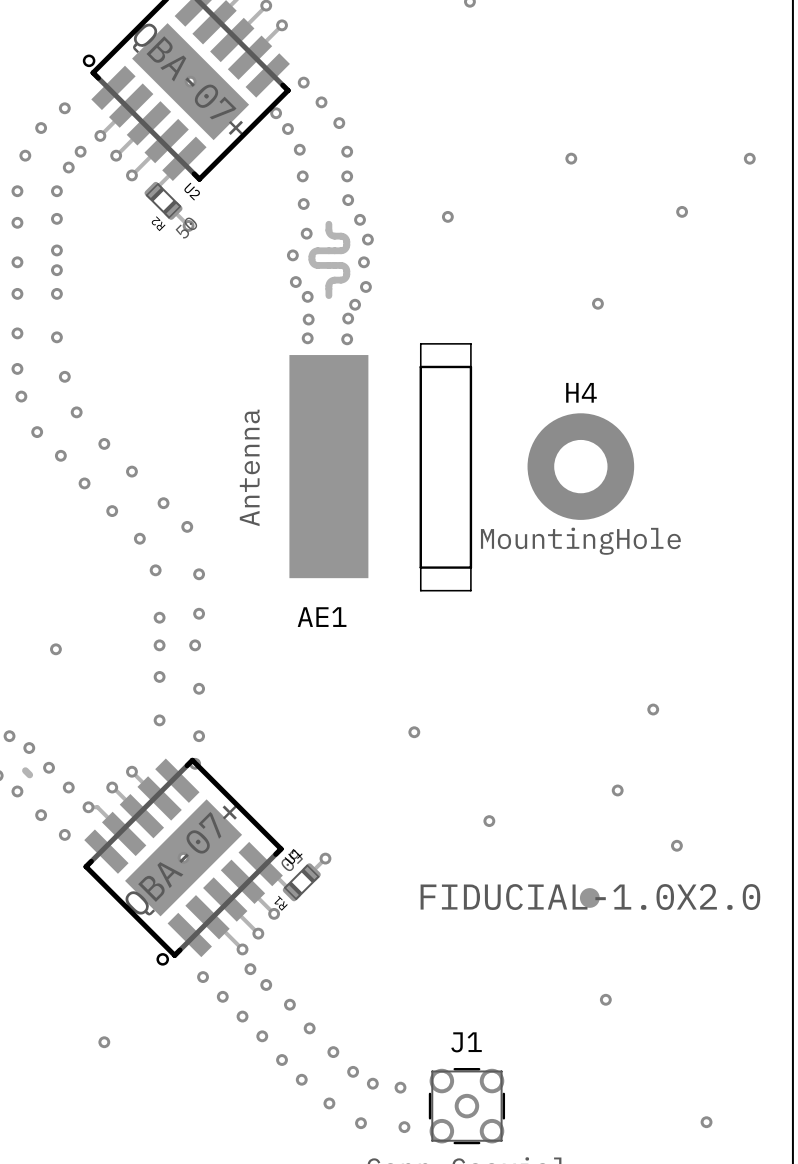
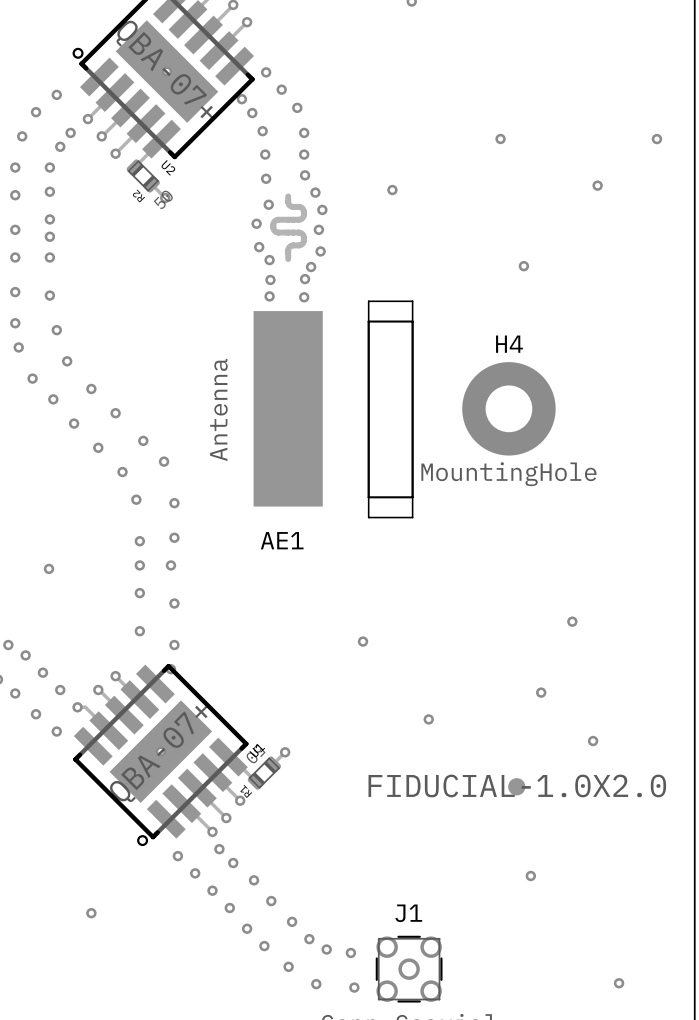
track: (25, 770) (29, 774) -> none

